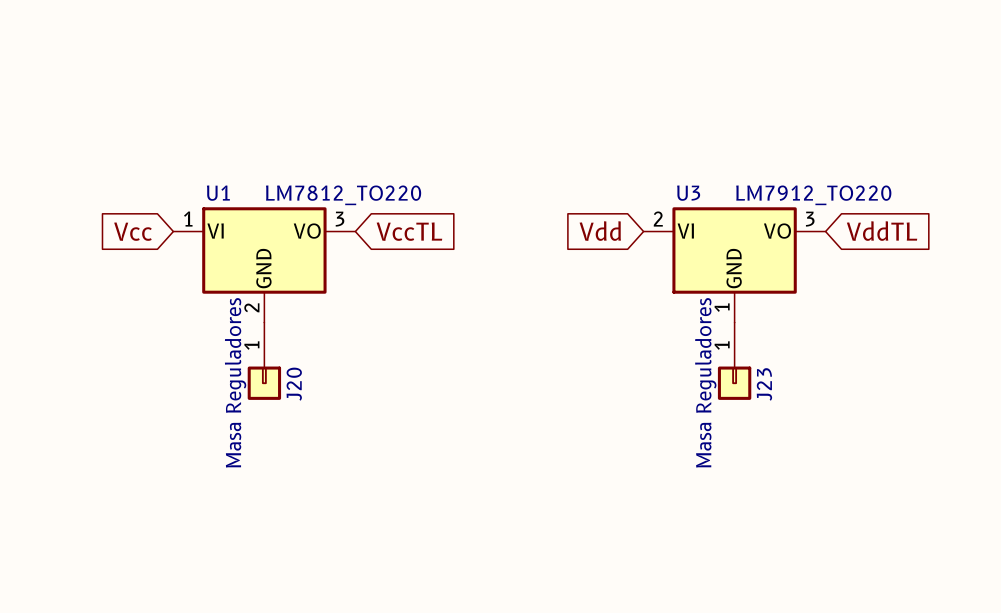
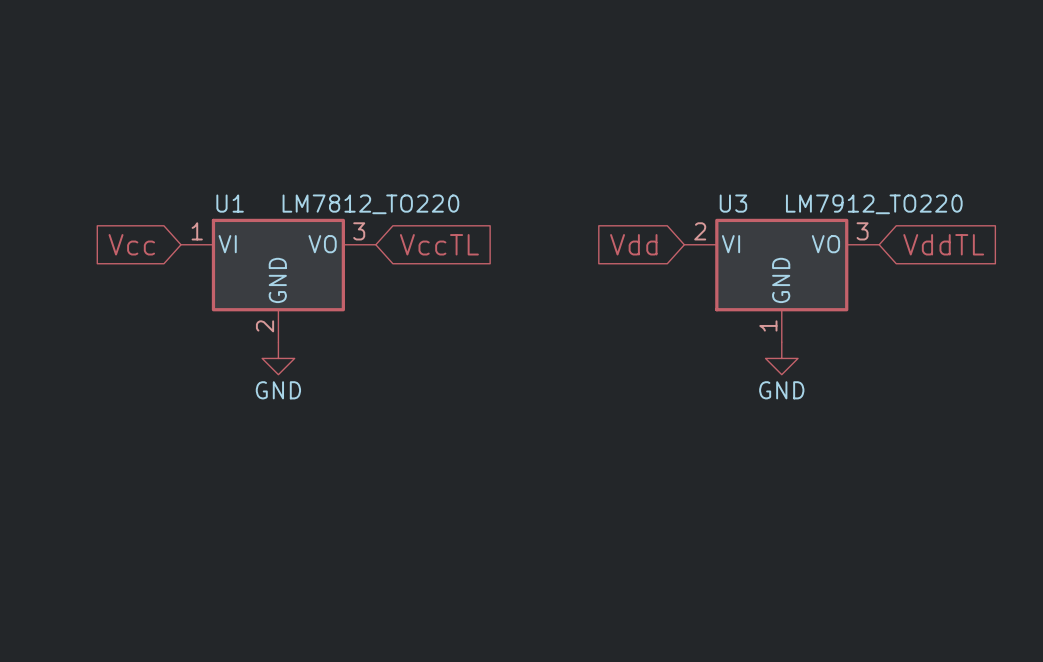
power symbol: none -> GND (278, 358)
power symbol: none -> GND (781, 358)
J20: Masa Reguladores (264, 361) -> none
J23: Masa Reguladores (734, 361) -> none

